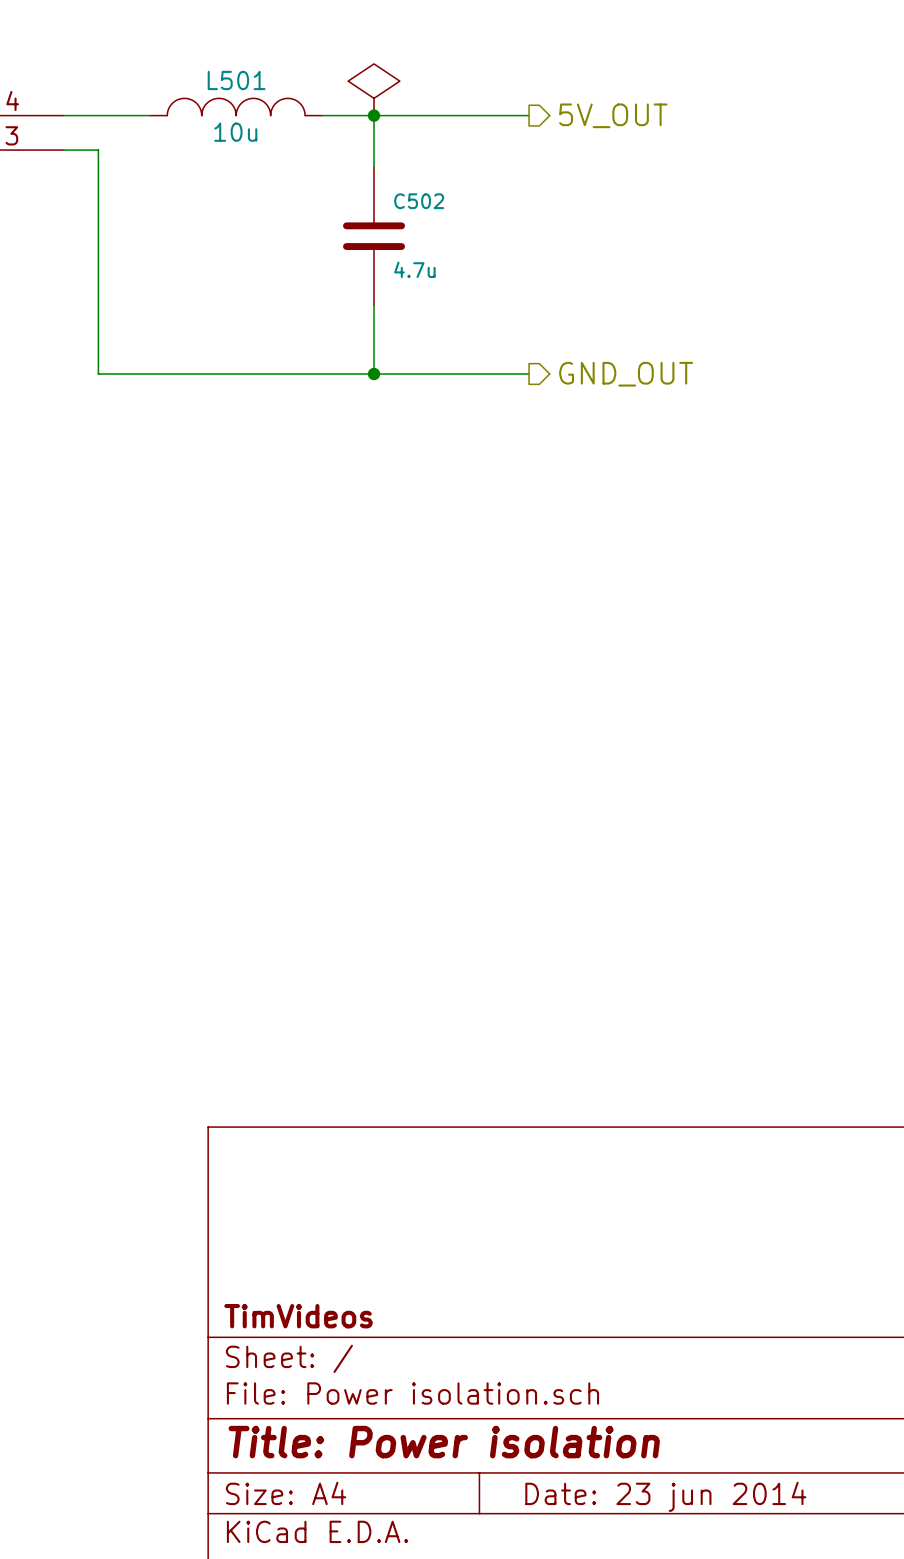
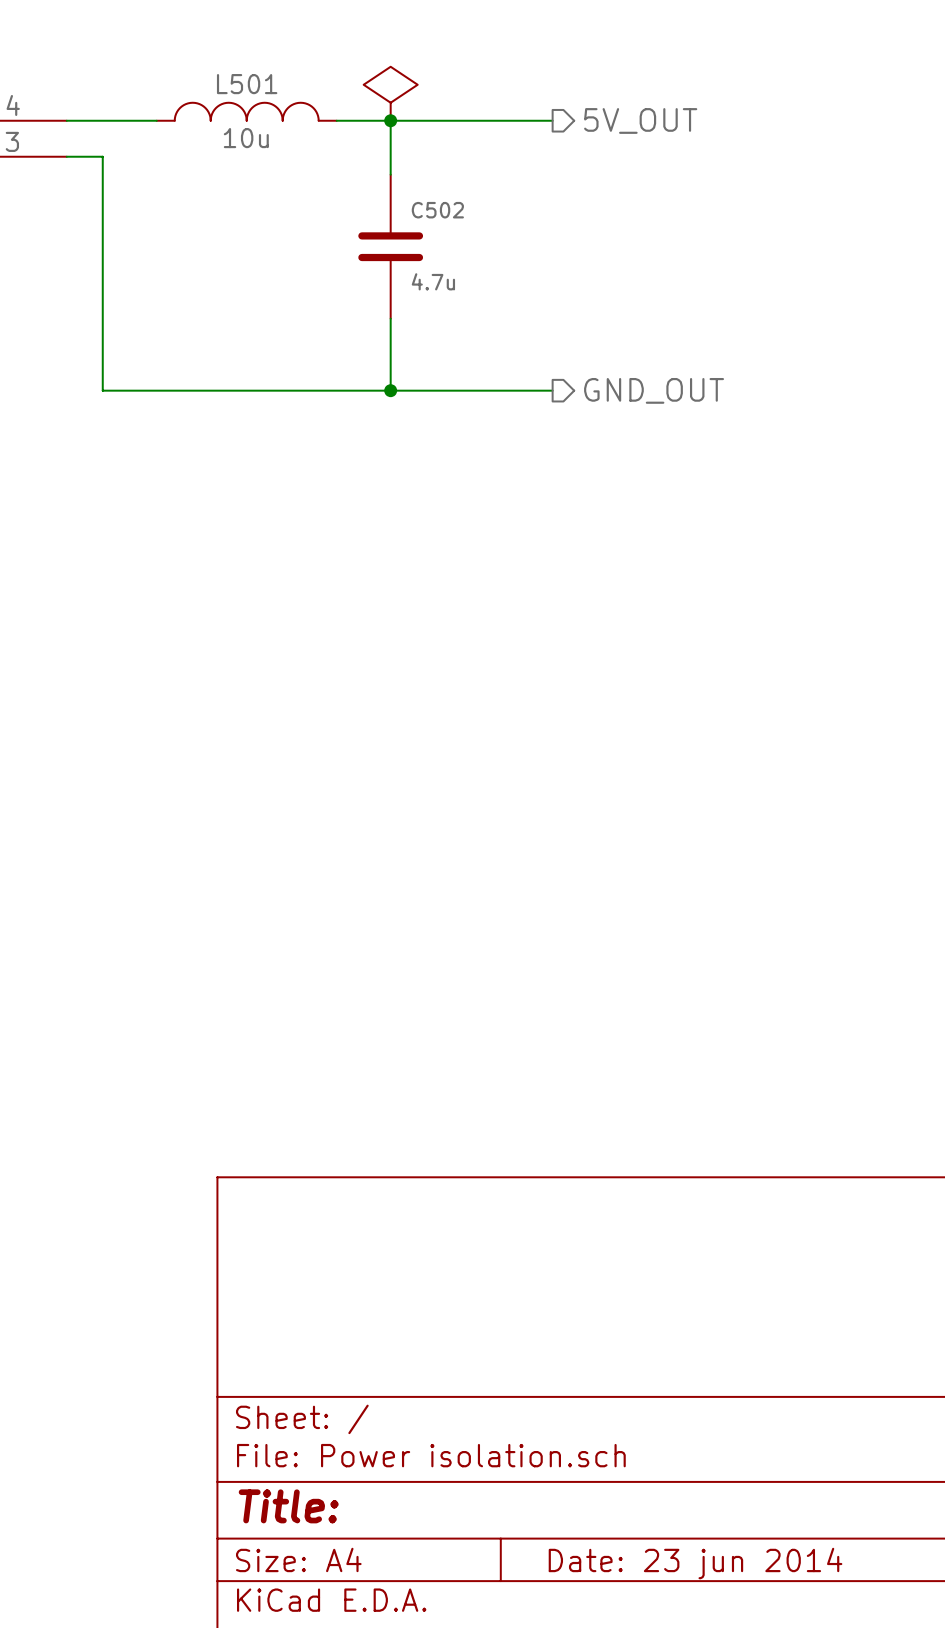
title block: TimVideos (298, 1316) -> none
title block: Title: Power isolation (444, 1442) -> Title: (288, 1506)

